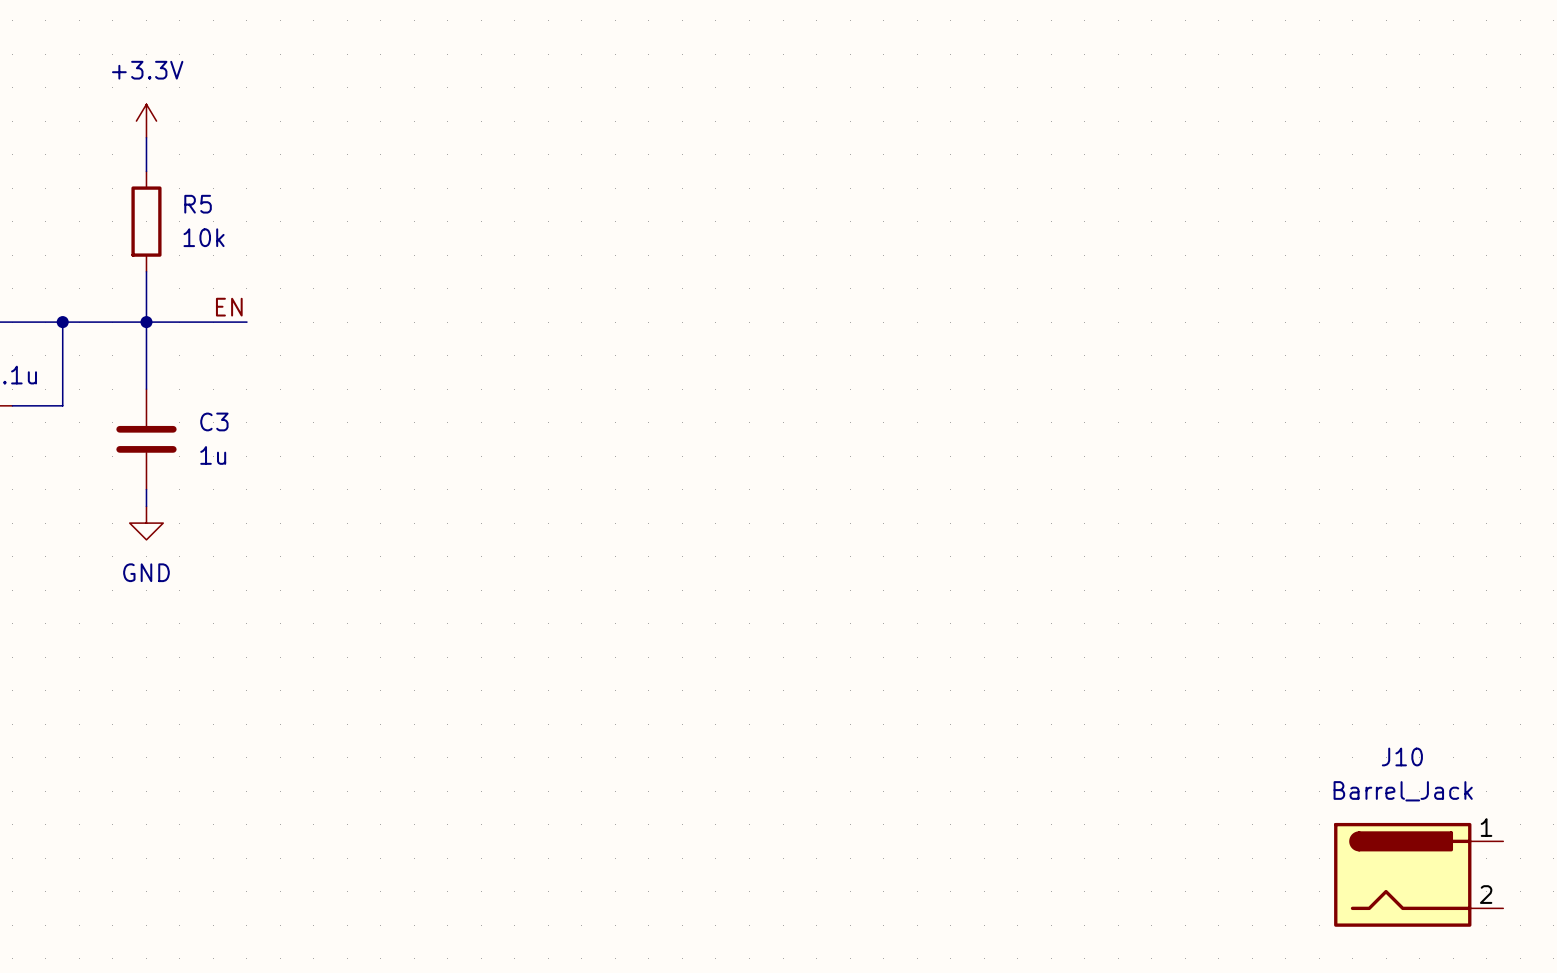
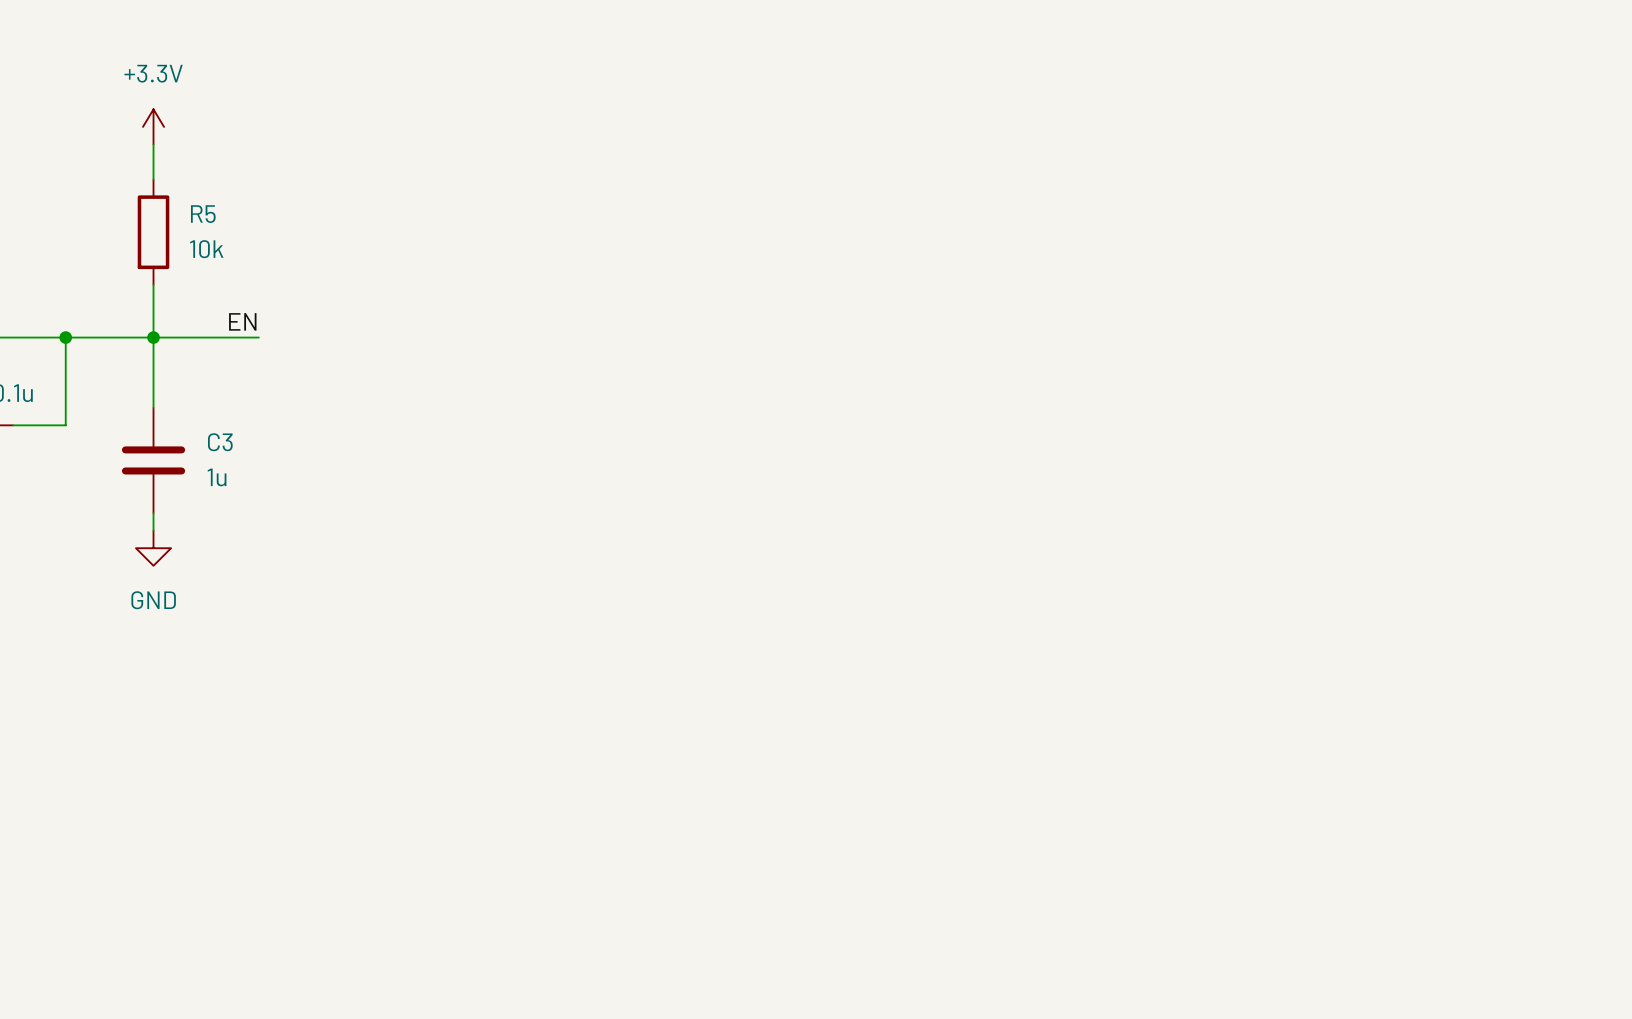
J10: Barrel_Jack (1418, 874) -> none

